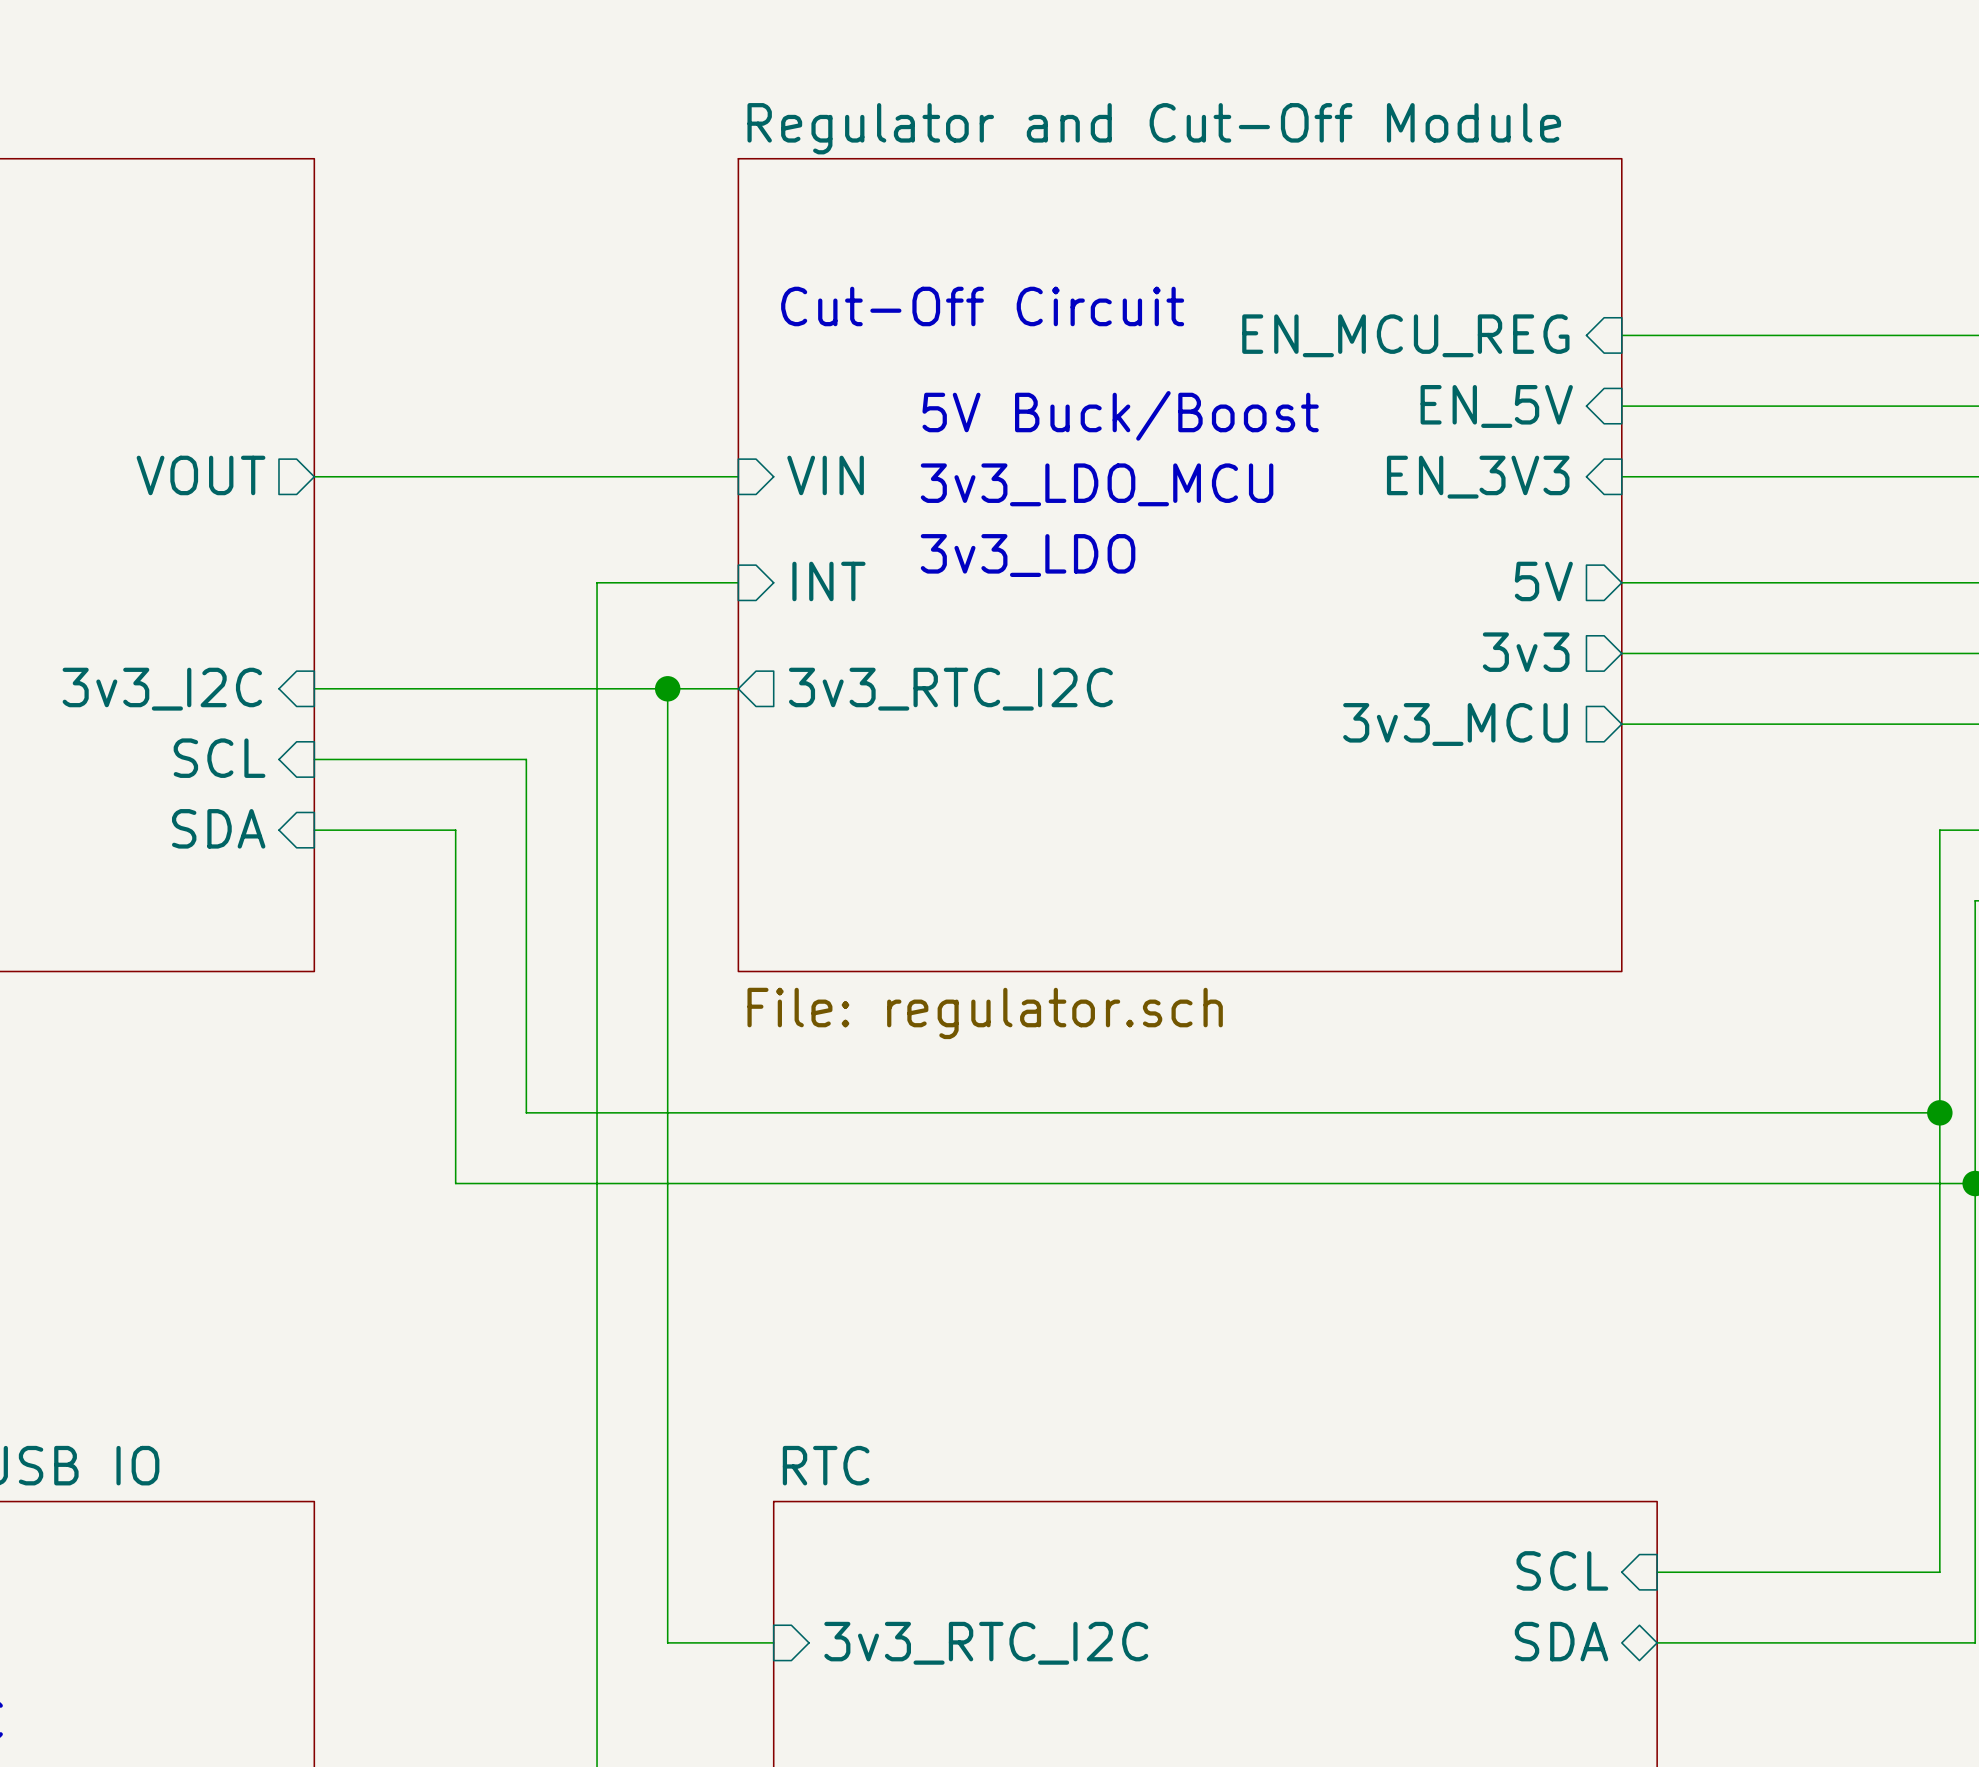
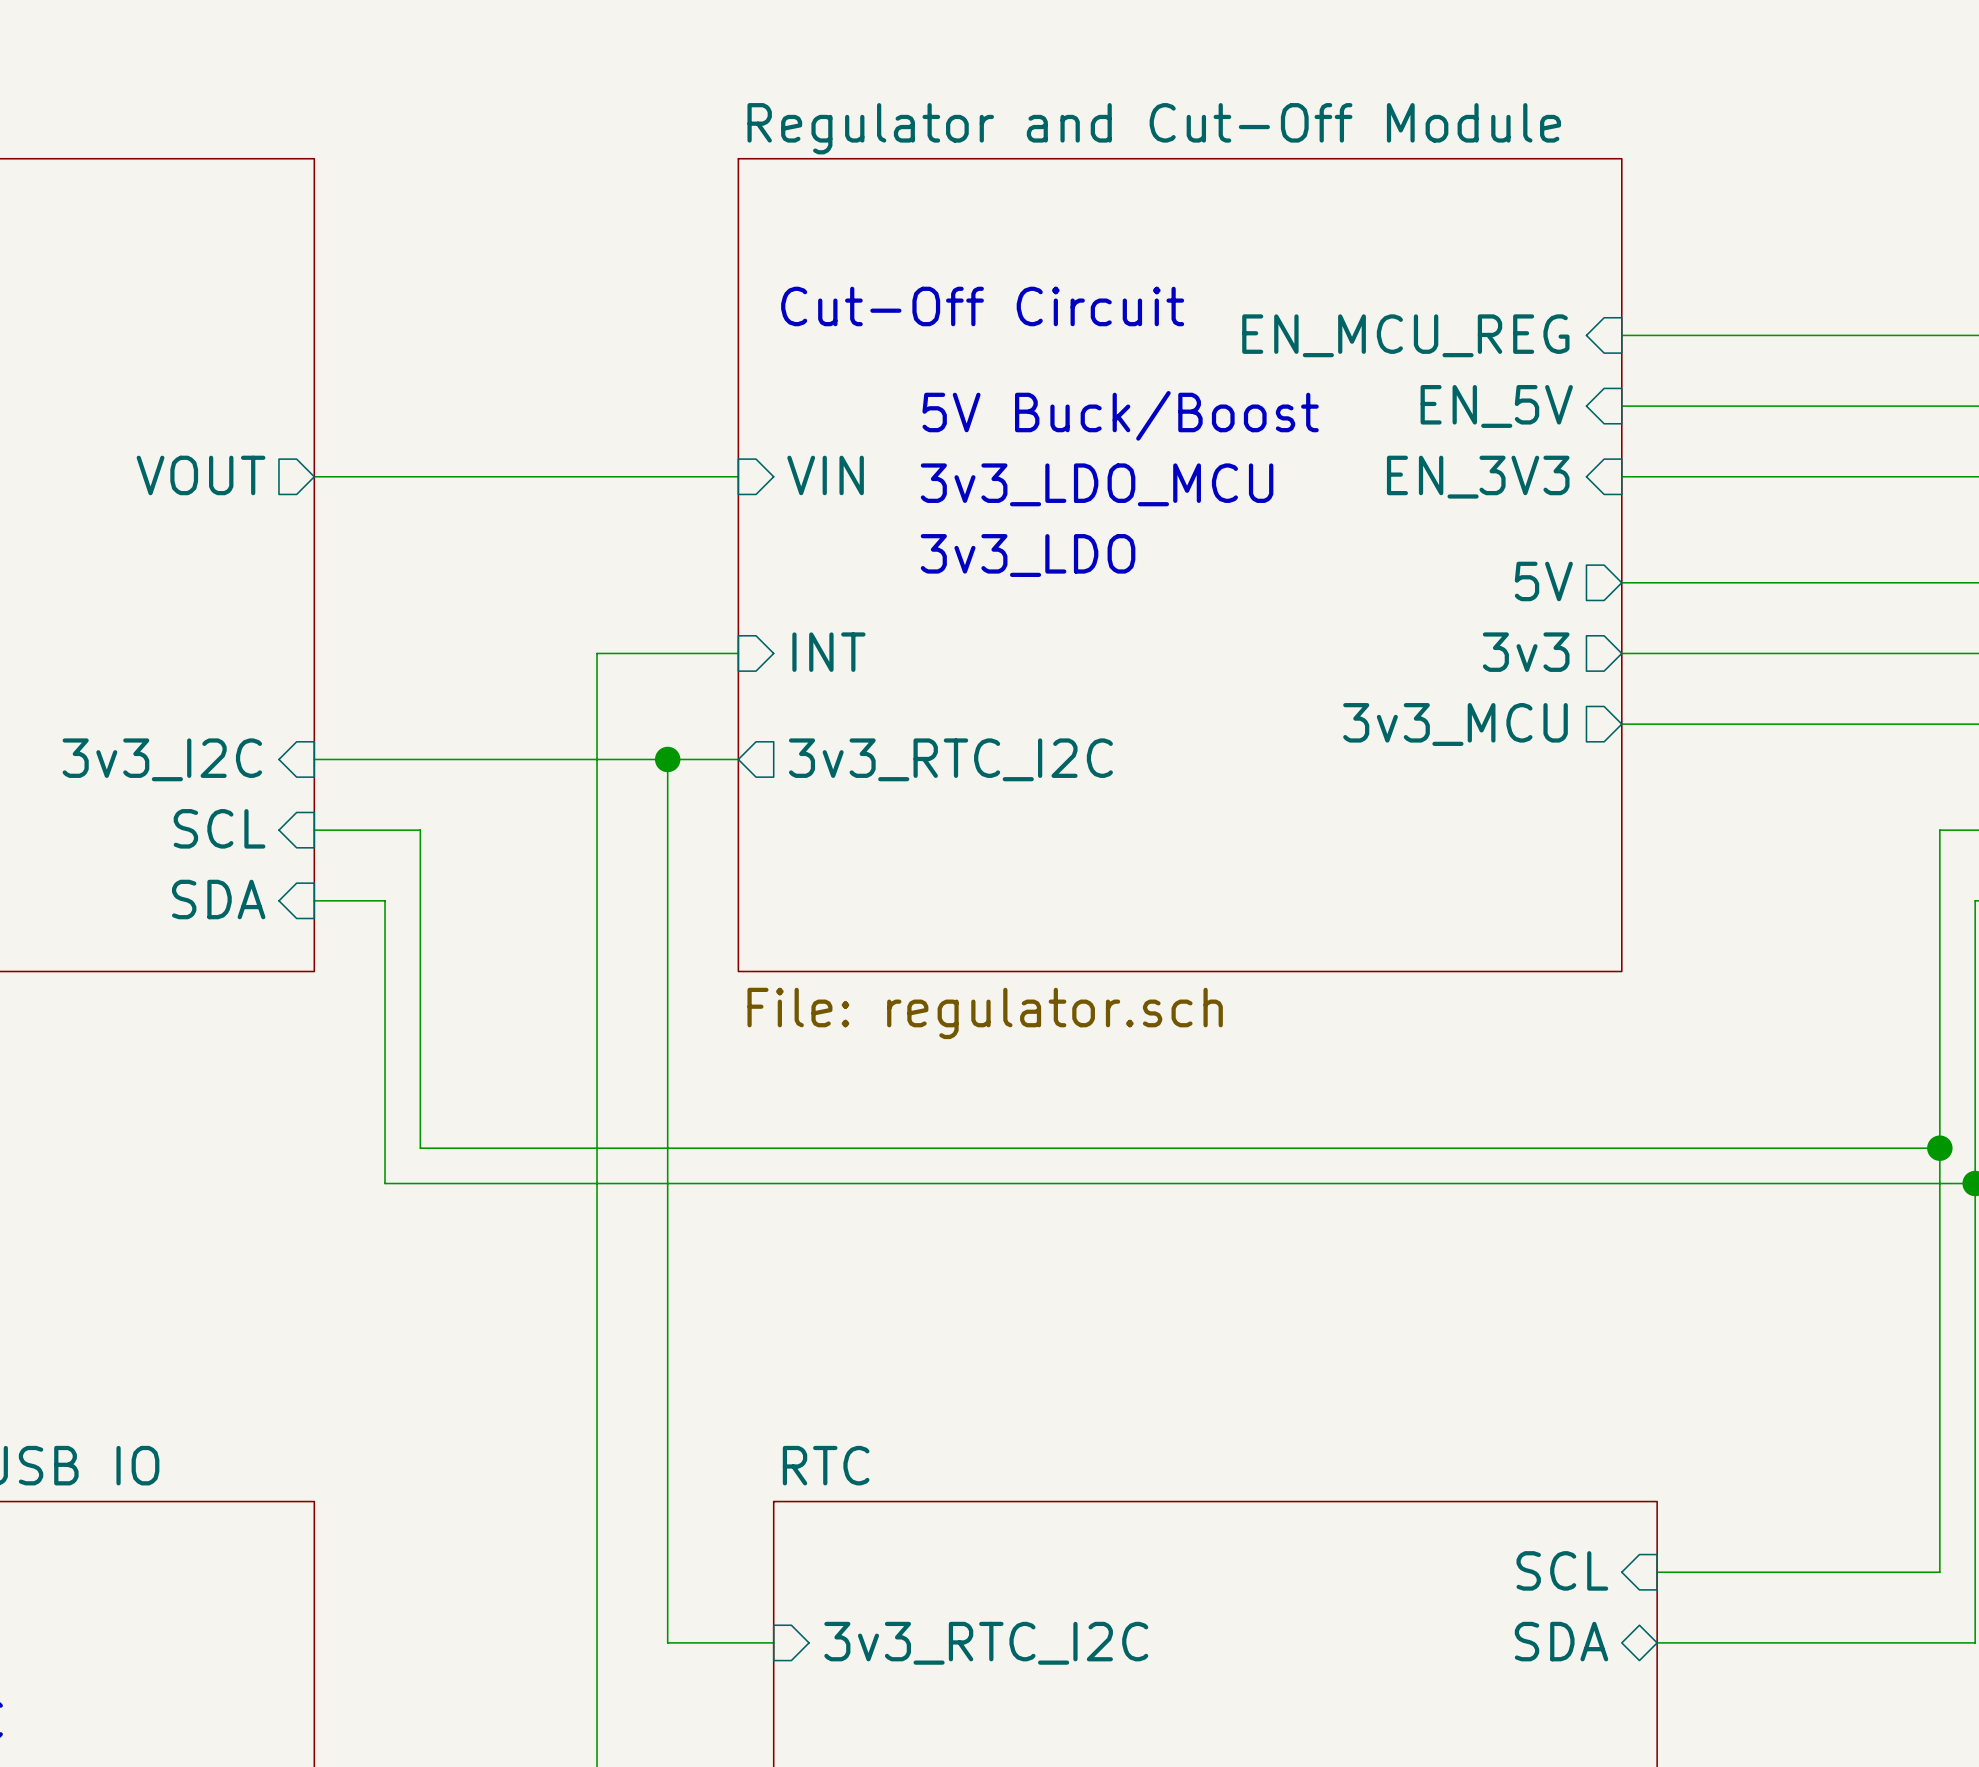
sheet pin position: INT (828, 581) -> INT (828, 652)
wire: (738, 582) (597, 582) (597, 653) -> (738, 653) (597, 653)
wire: (314, 688) (738, 688) -> none
wire: (667, 688) (667, 759) -> none
junction position: (667, 688) -> (667, 759)
sheet pin: 3v3_I2C (162, 689) -> none
sheet pin position: 3v3_RTC_I2C (950, 689) -> 3v3_RTC_I2C (950, 759)
sheet pin: SCL (219, 758) -> 3v3_I2C (162, 759)
wire: (526, 759) (526, 1112) (1939, 1112) -> (526, 759) (738, 759)
sheet pin: SDA (218, 828) -> SCL (219, 828)
wire: (420, 830) (455, 830) (455, 1183) -> (314, 900) (384, 900) (384, 1183) (455, 1183)
wire: none -> (420, 830) (420, 1148) (1939, 1148)
sheet pin: none -> SDA (218, 899)
junction position: (1939, 1112) -> (1939, 1148)

